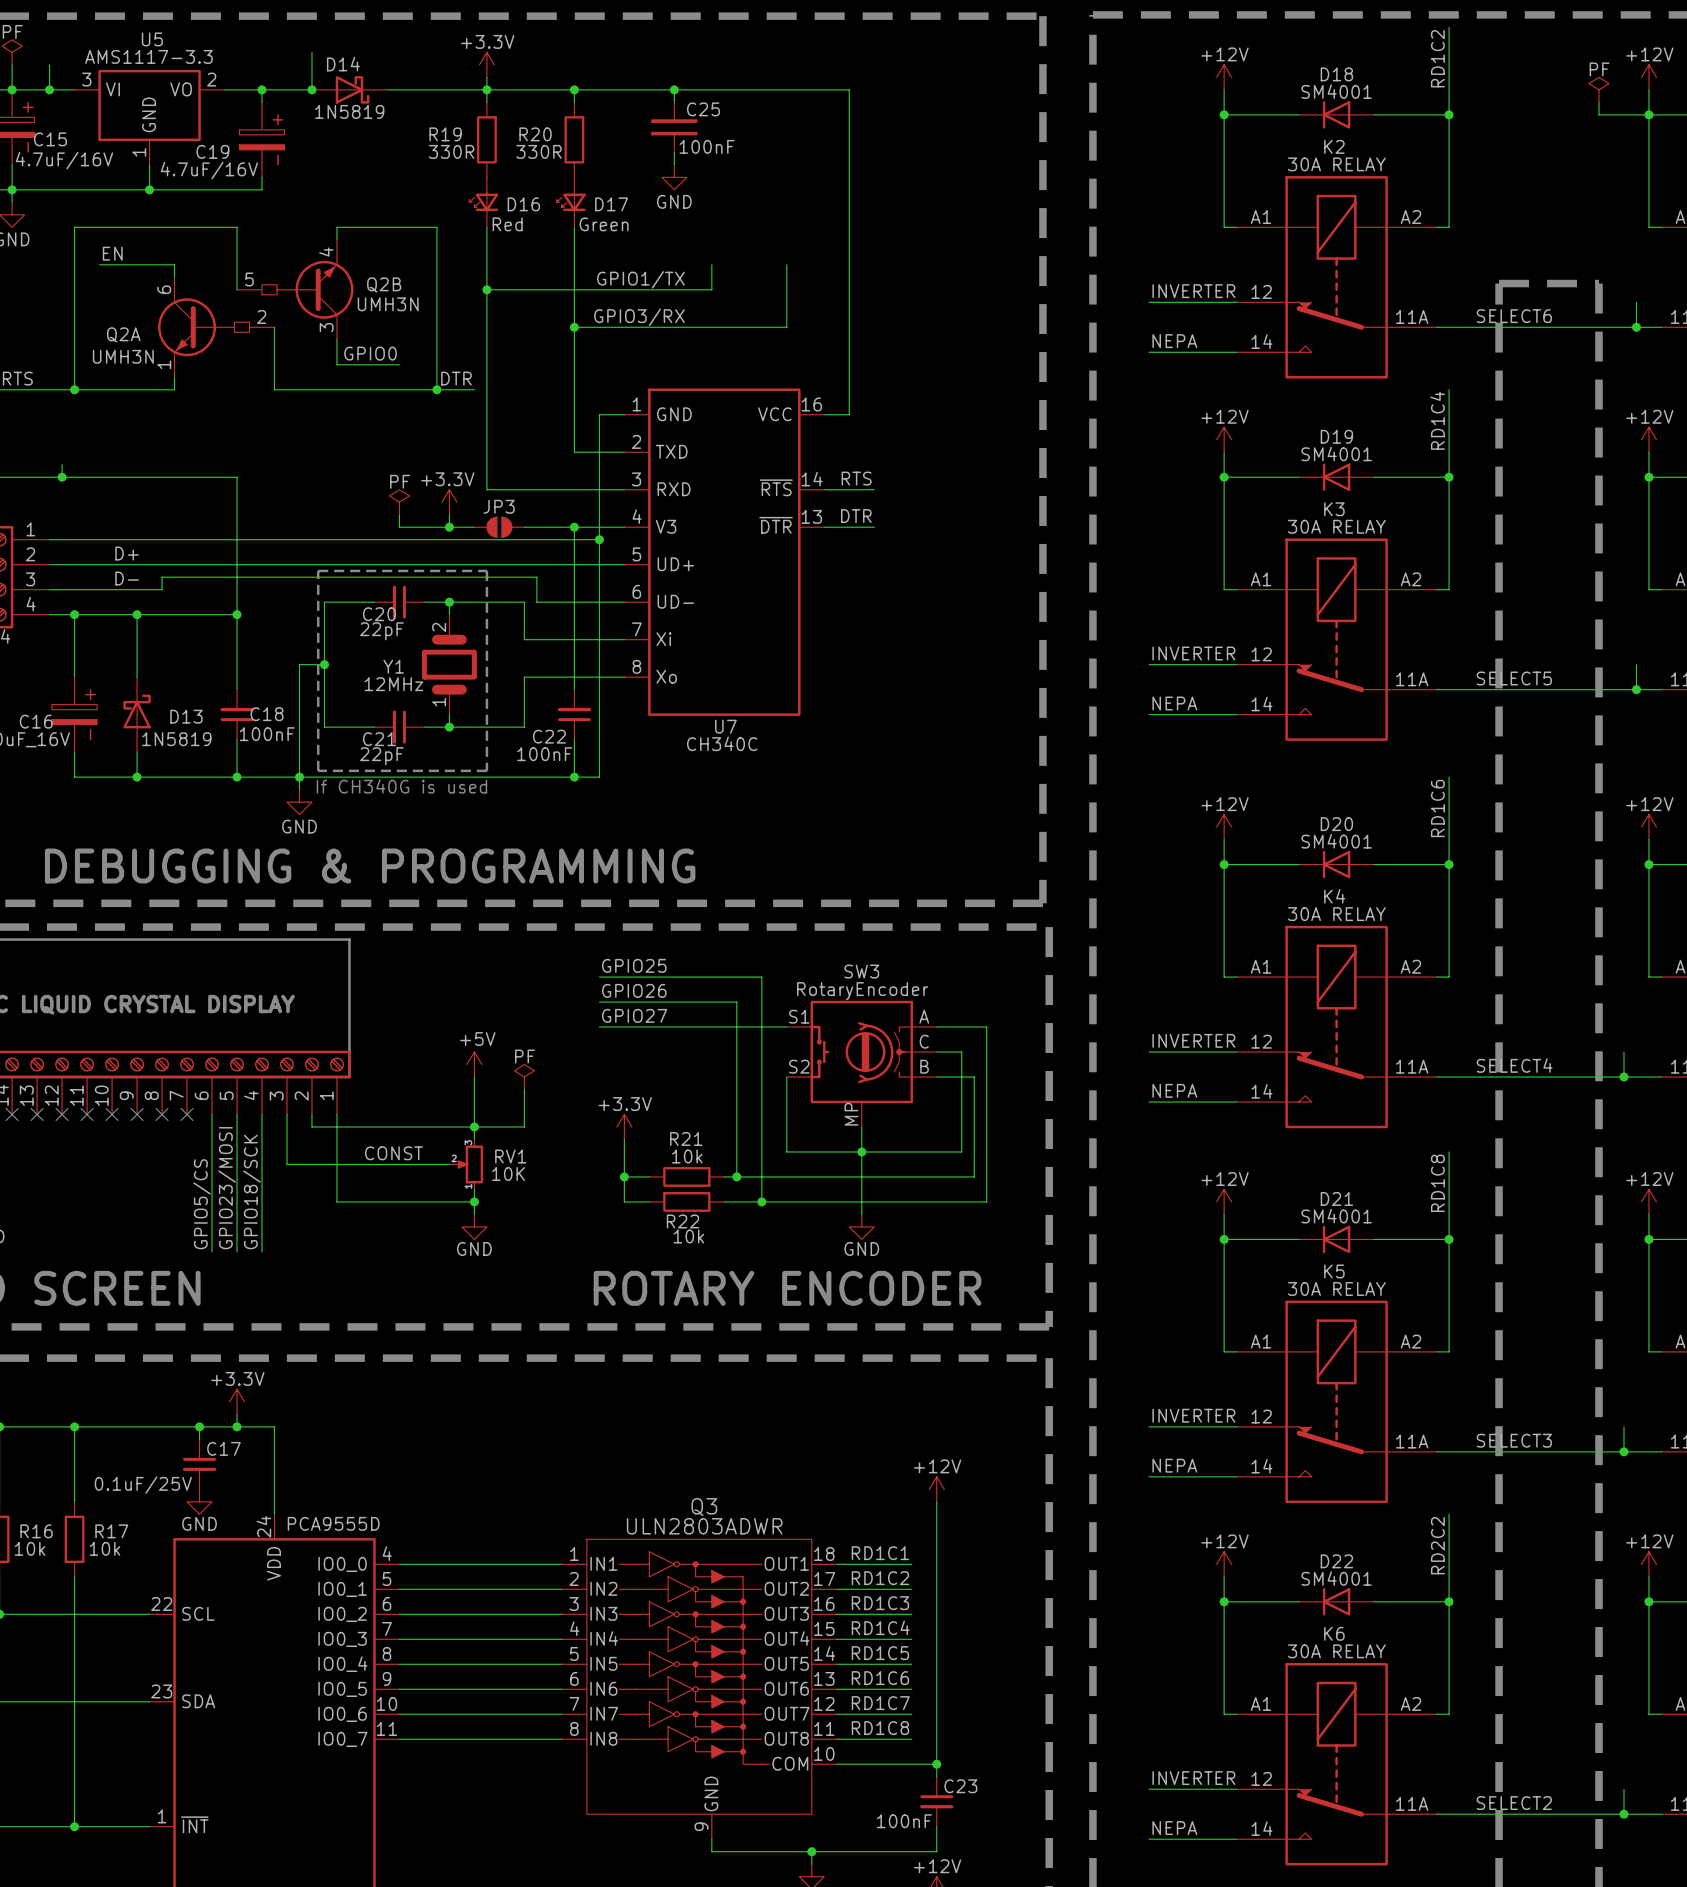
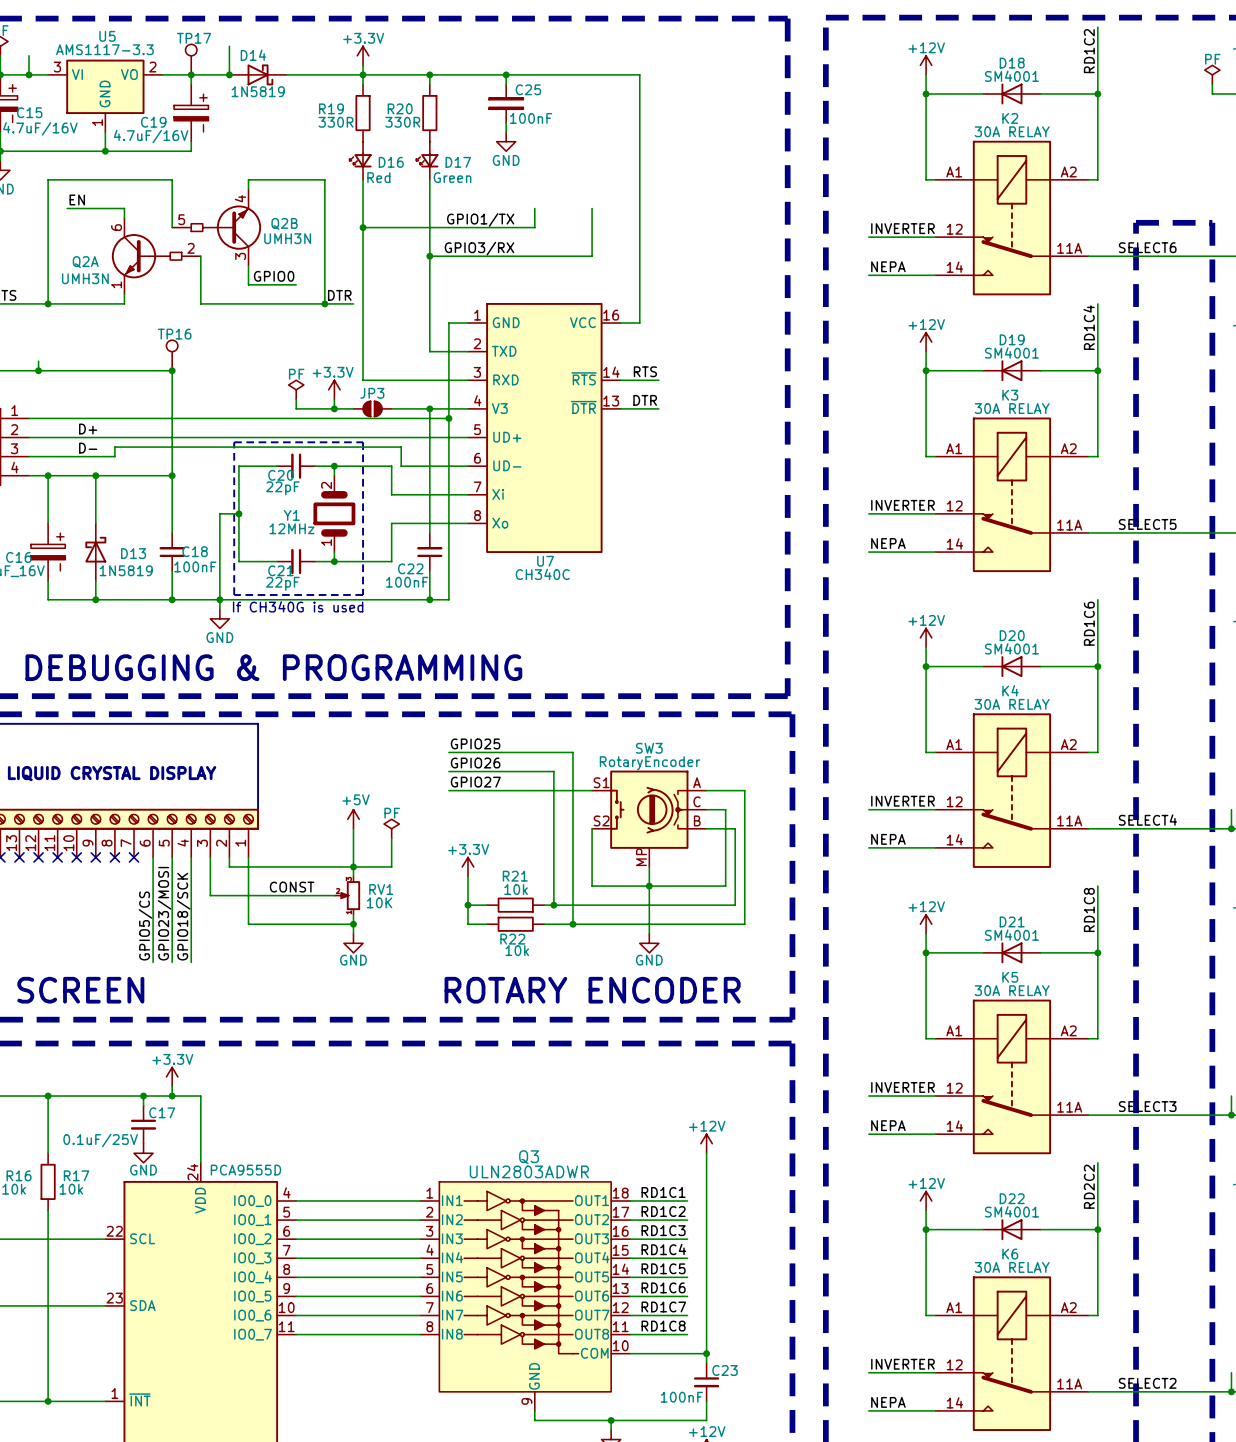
TP17: none -> (191, 59)
TP16: none -> (172, 355)
junction: none -> (172, 370)

